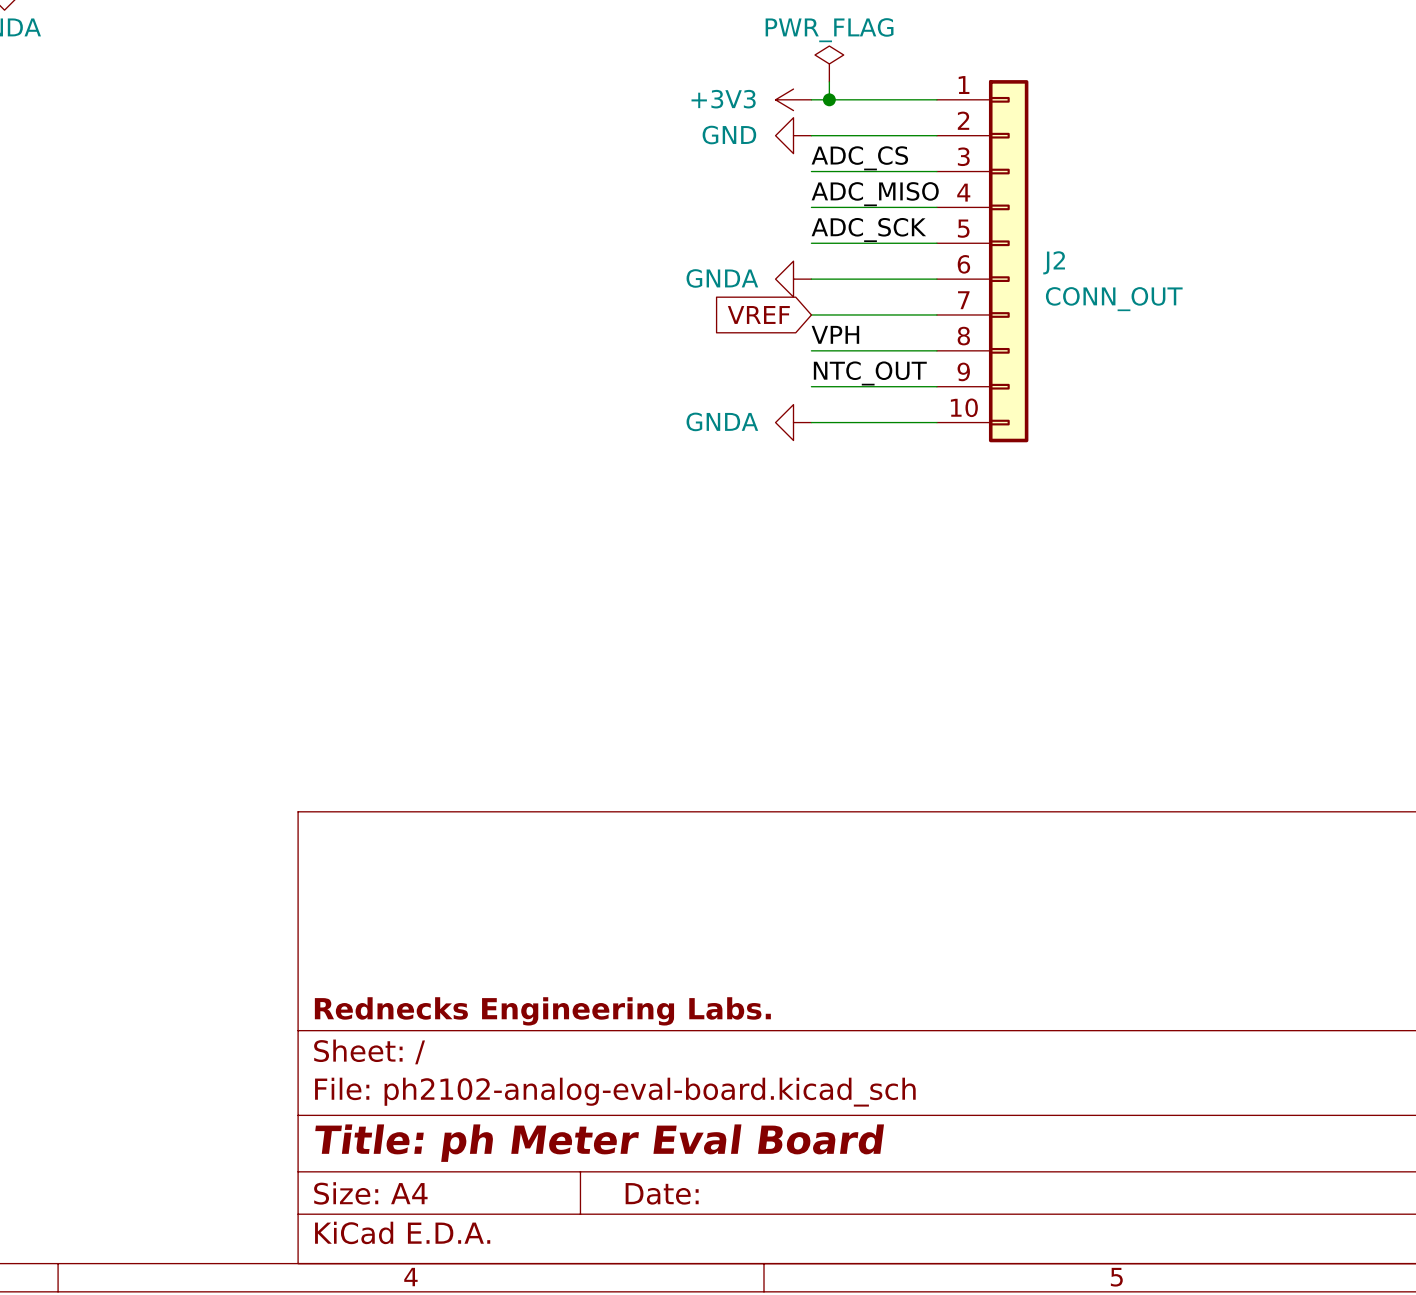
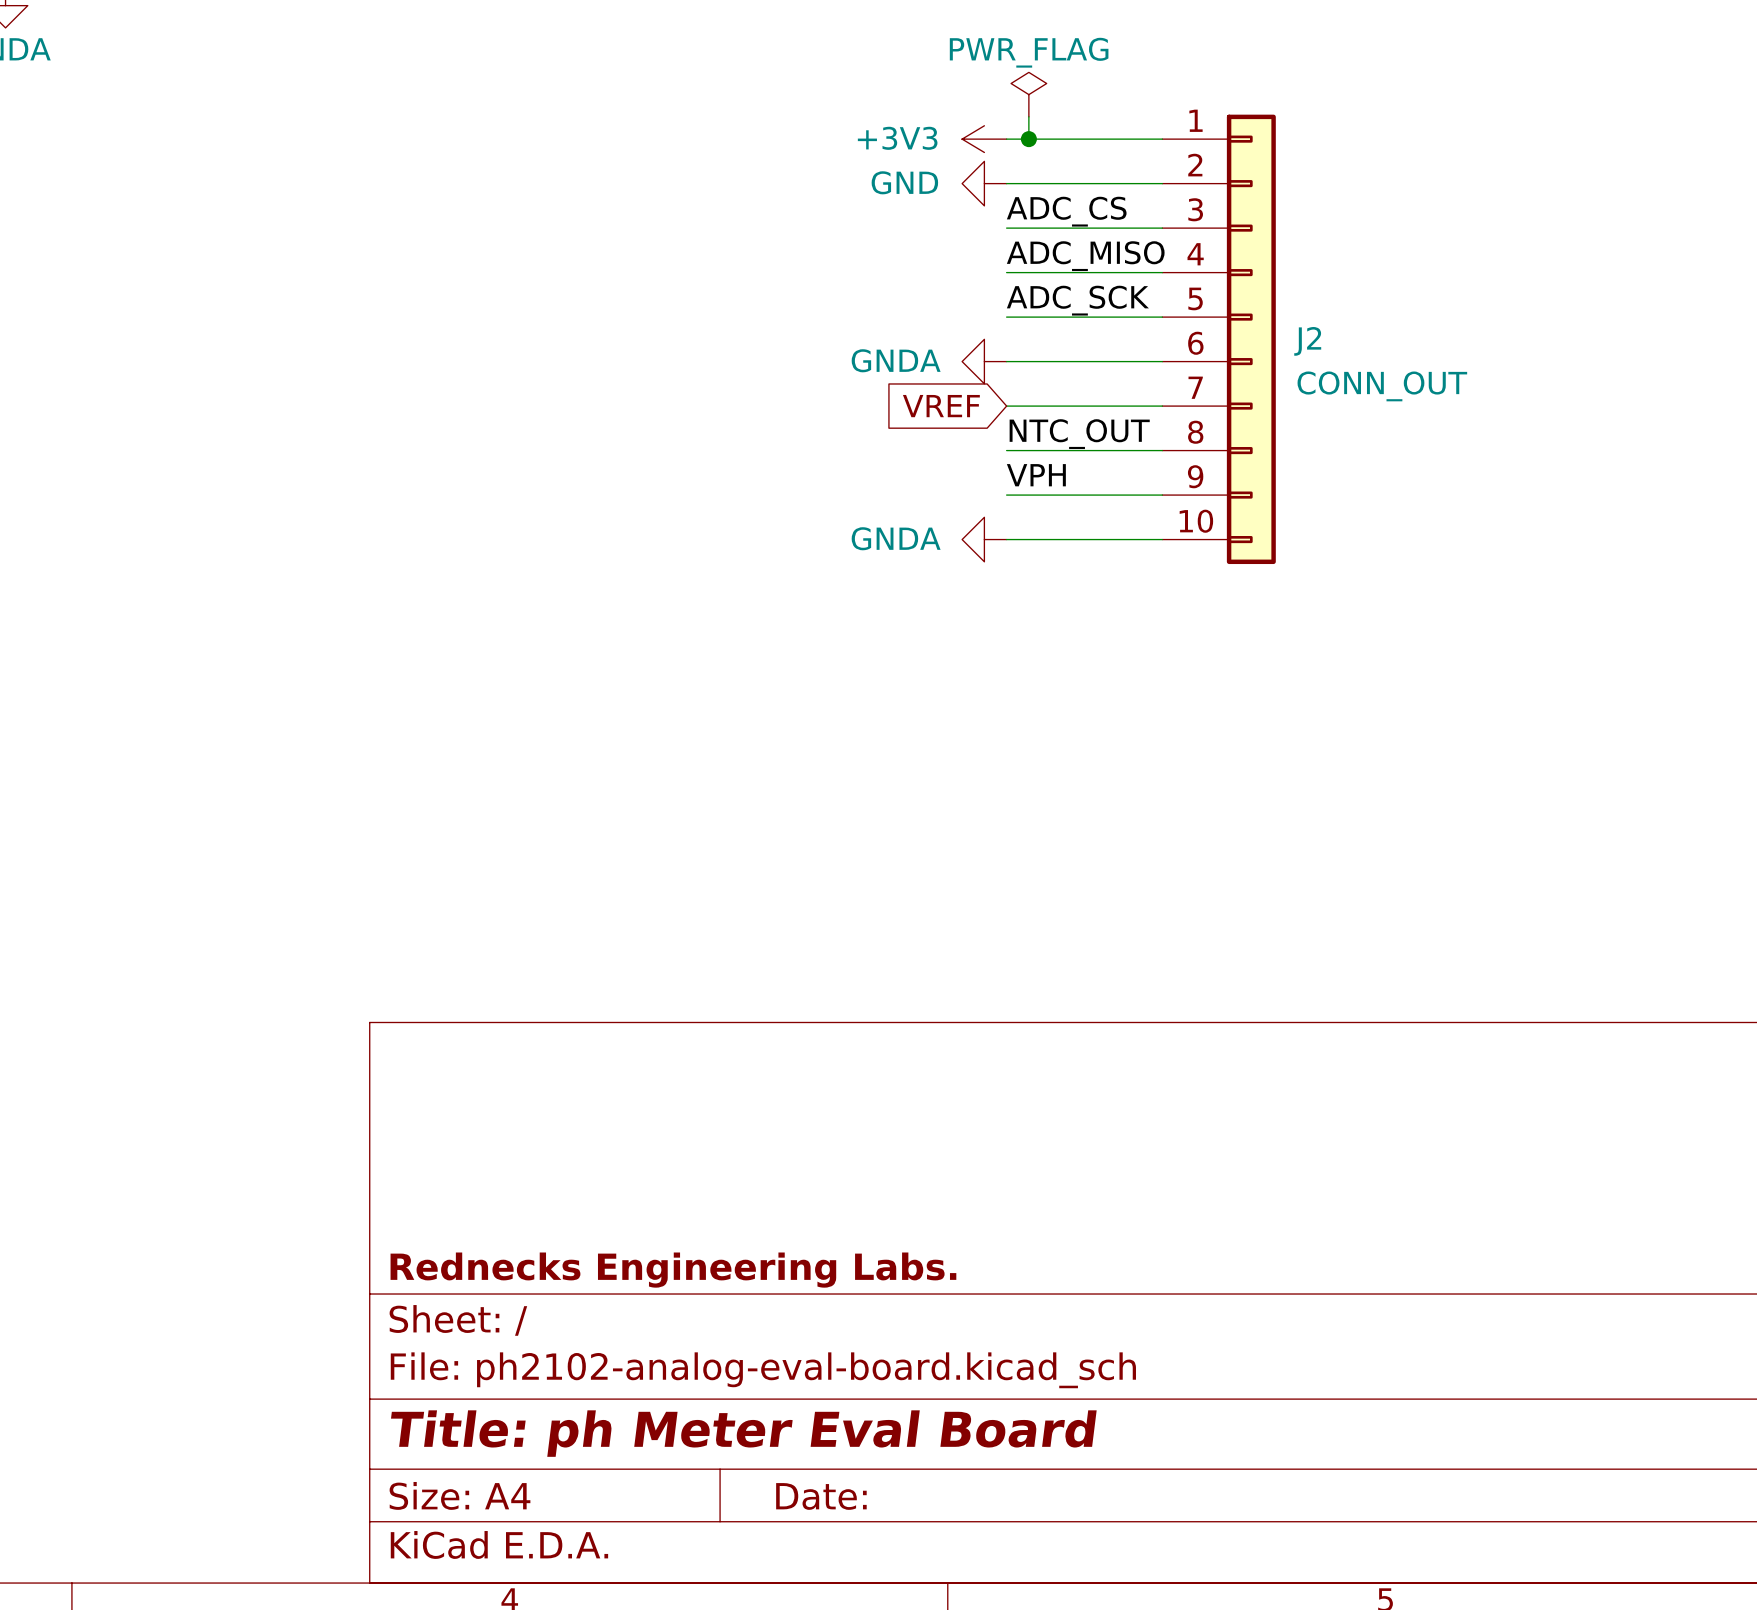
label: VPH (835, 334) -> NTC_OUT (1079, 434)
label: NTC_OUT (870, 373) -> VPH (1036, 475)

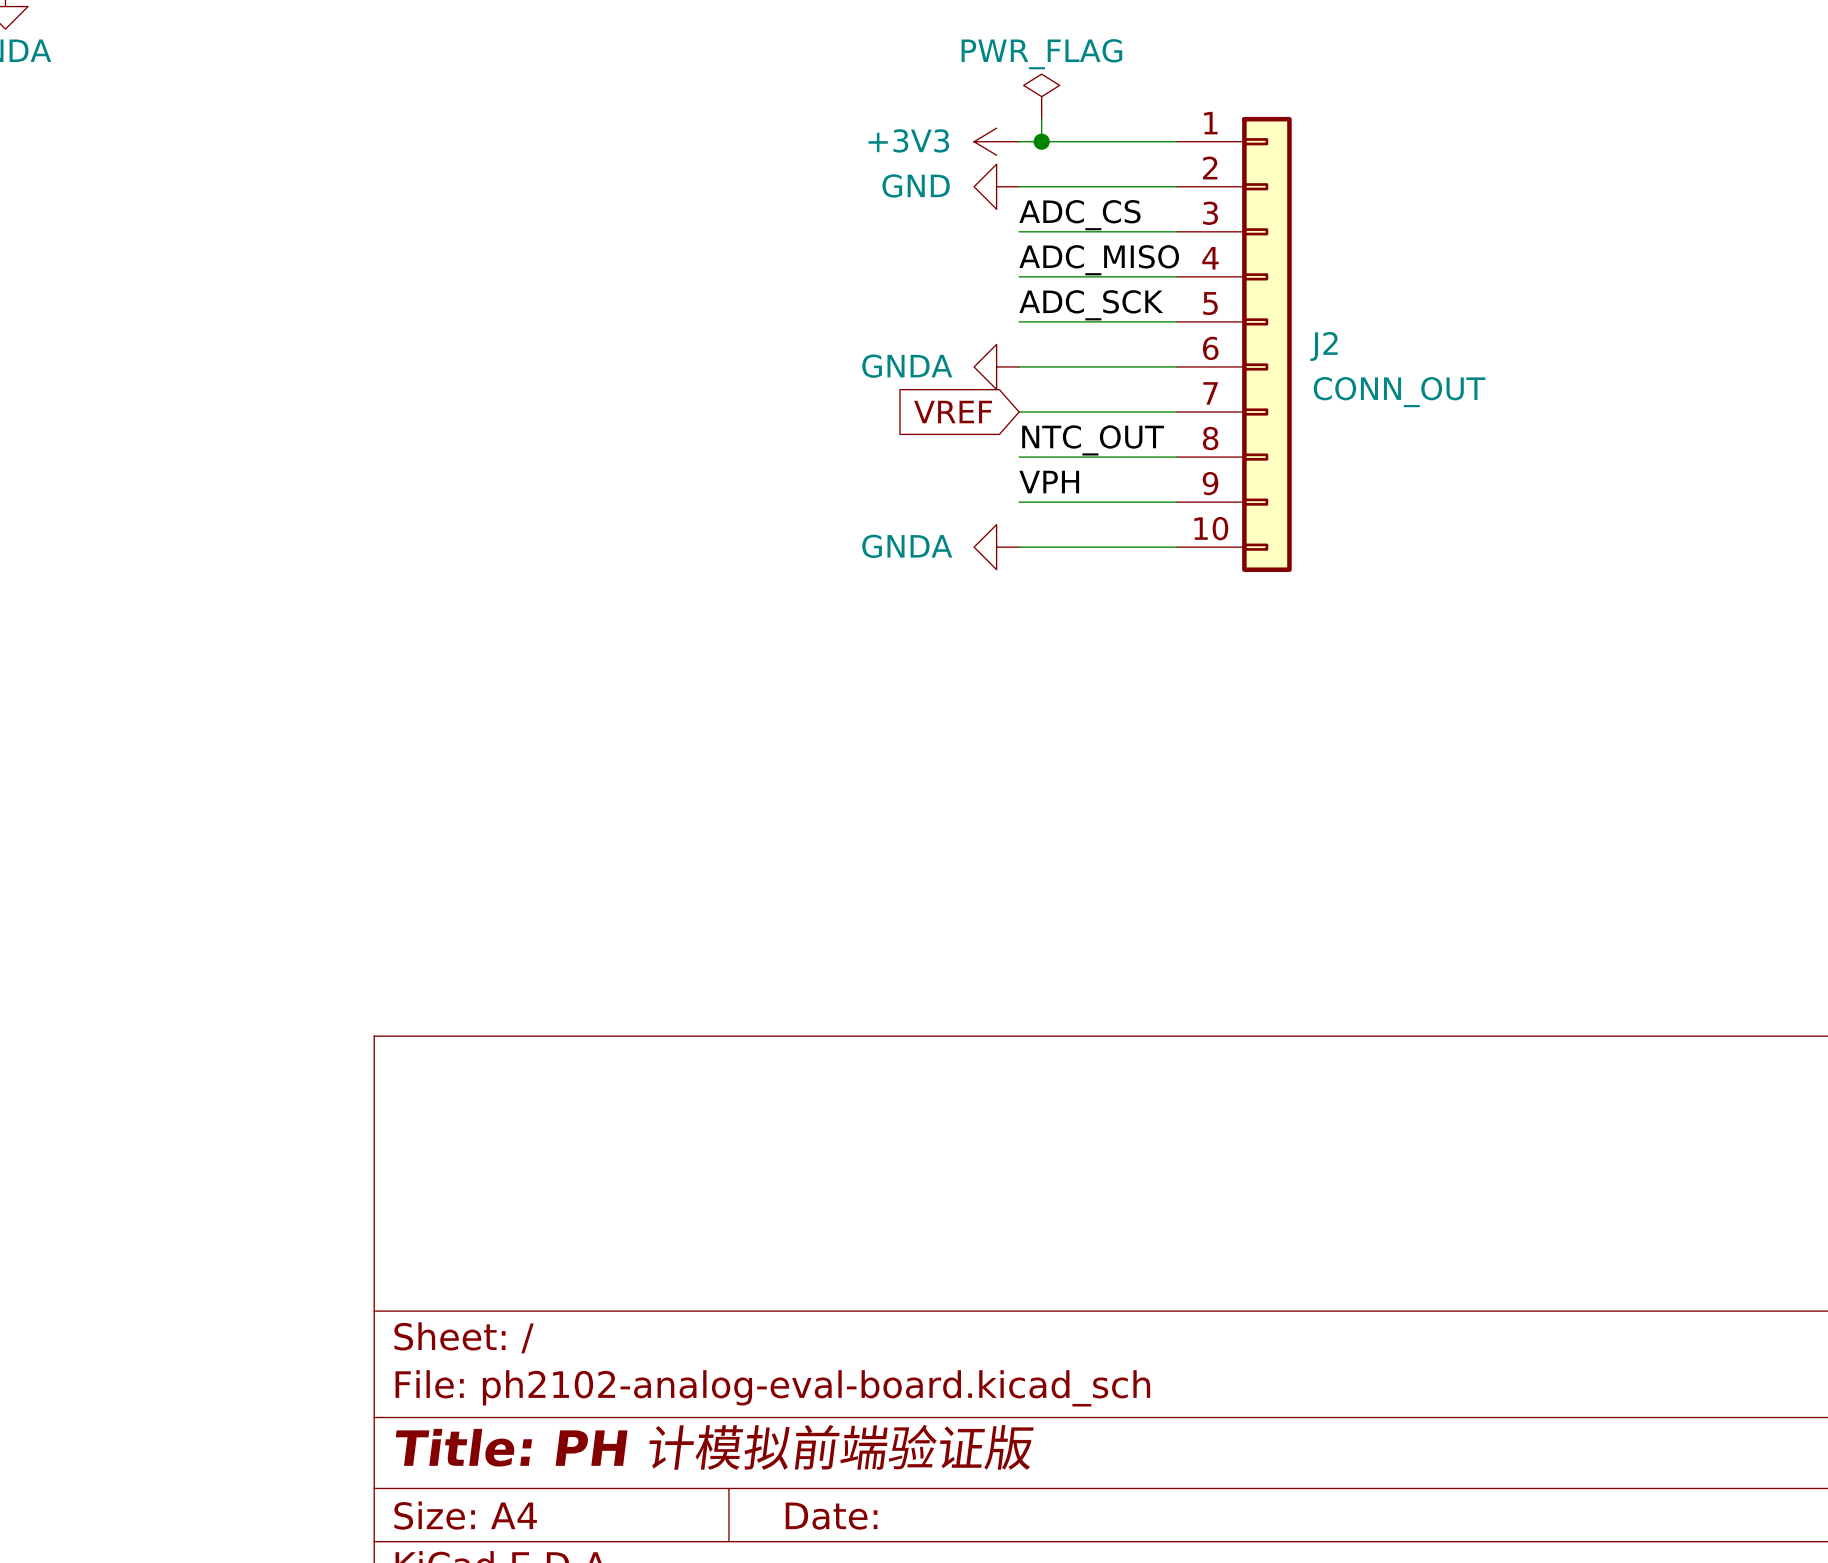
title block: Rednecks Engineering Labs. (673, 1270) -> none
title block: Title: ph Meter Eval Board (743, 1433) -> Title: PH 计模拟前端验证版 (714, 1447)

